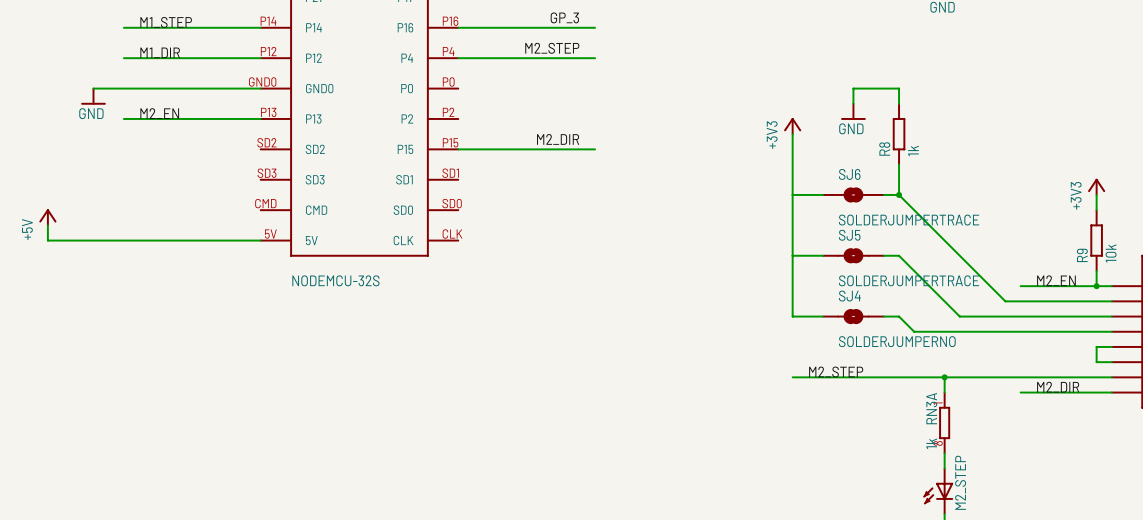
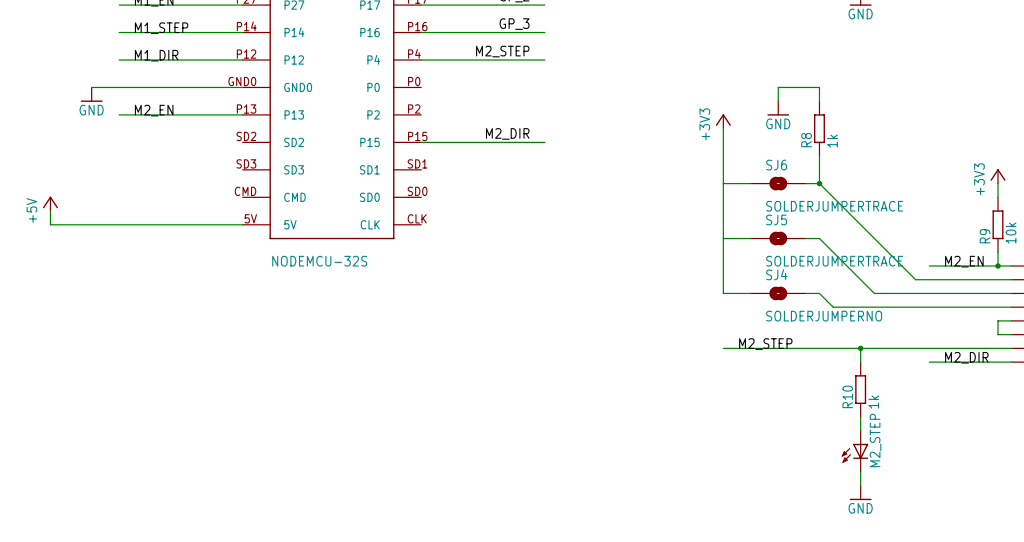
RN3A: 1k (944, 422) -> none
R10: none -> 1k (860, 389)

